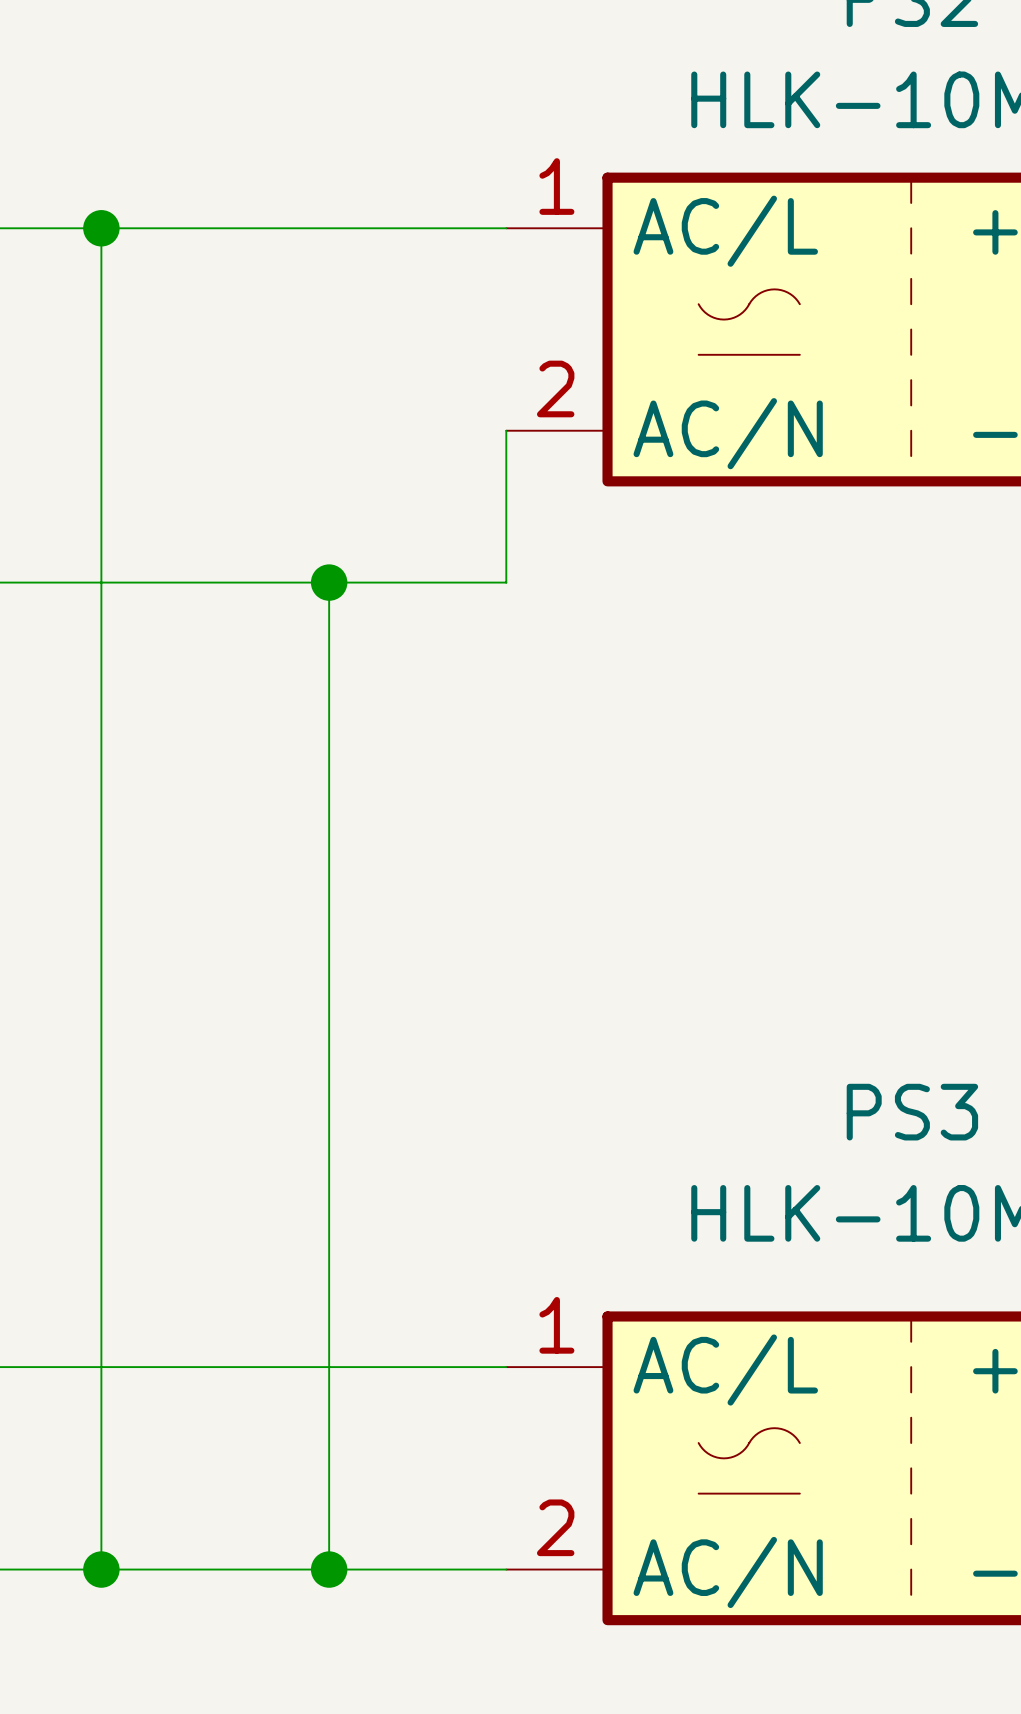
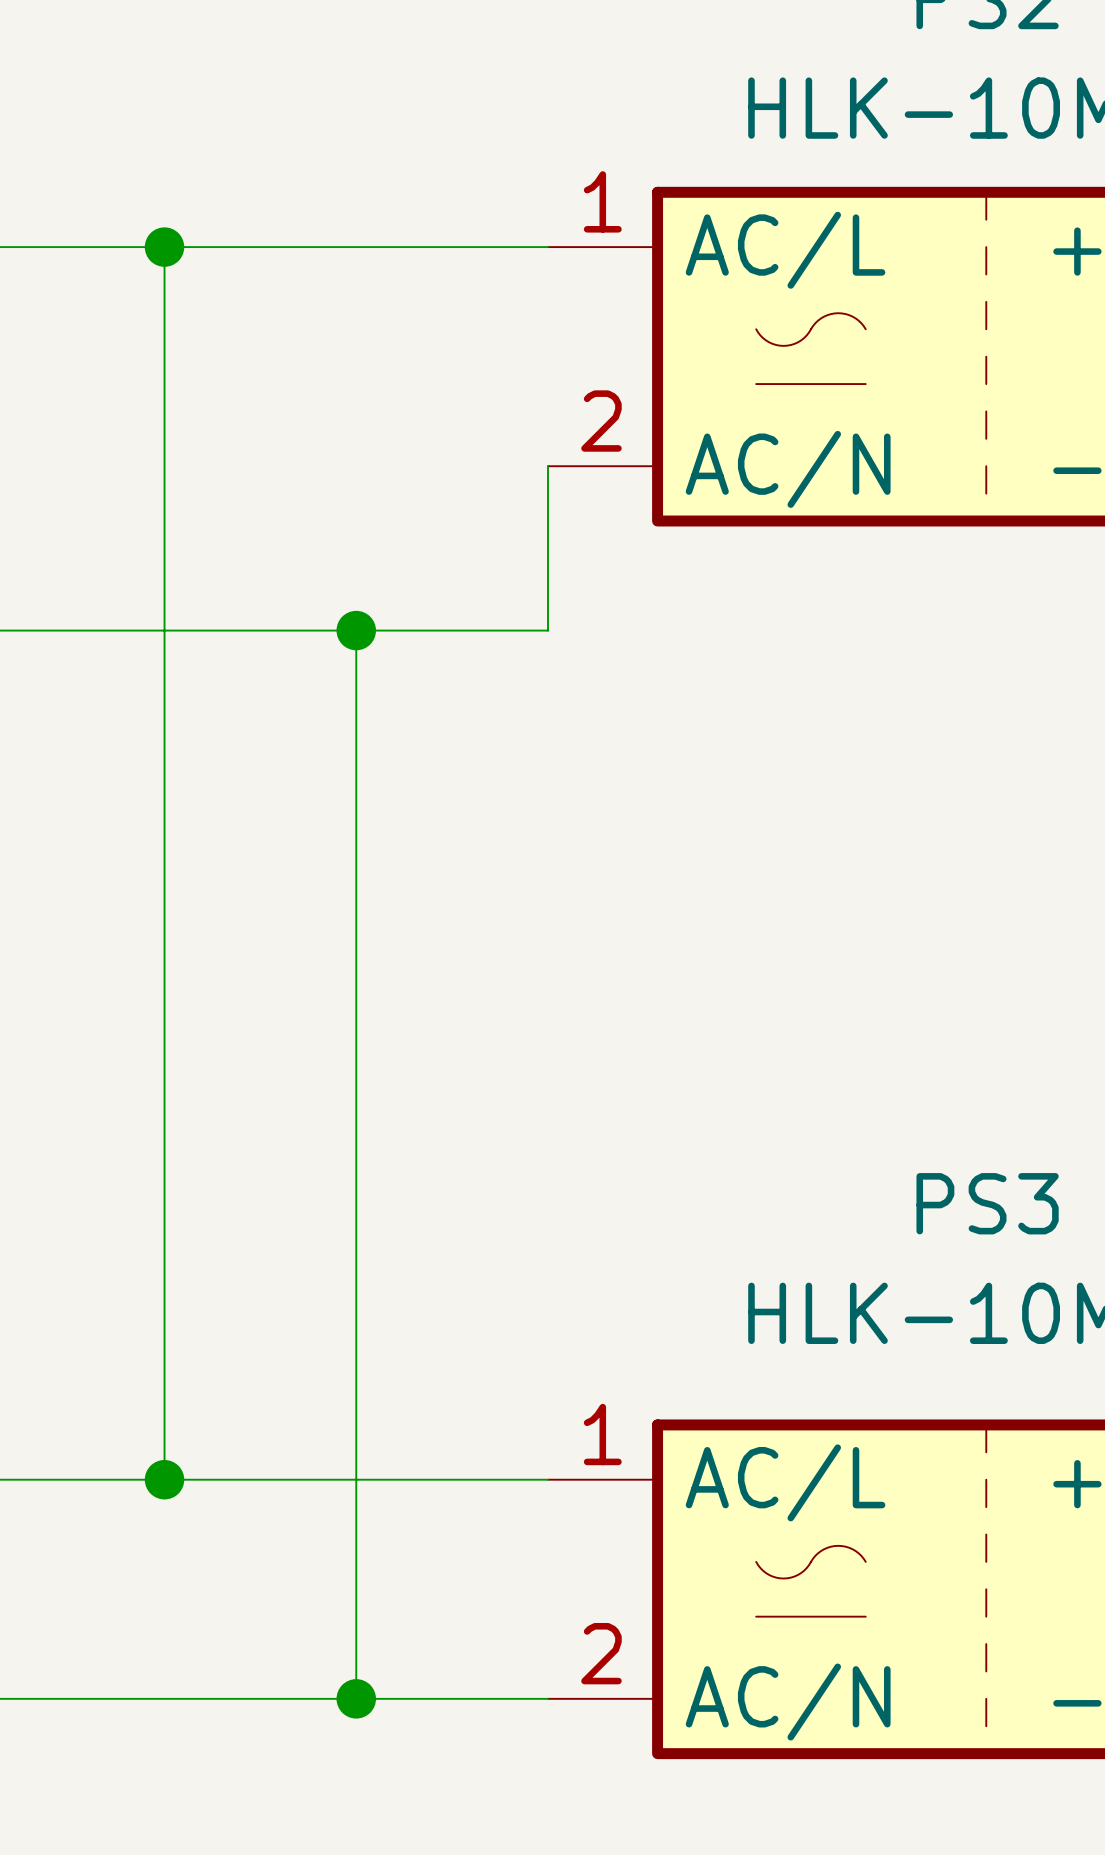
wire: (101, 228) (101, 1569) -> none
junction position: (101, 228) -> (164, 247)
wire: none -> (164, 247) (164, 1479)
junction position: (101, 1569) -> (164, 1479)

